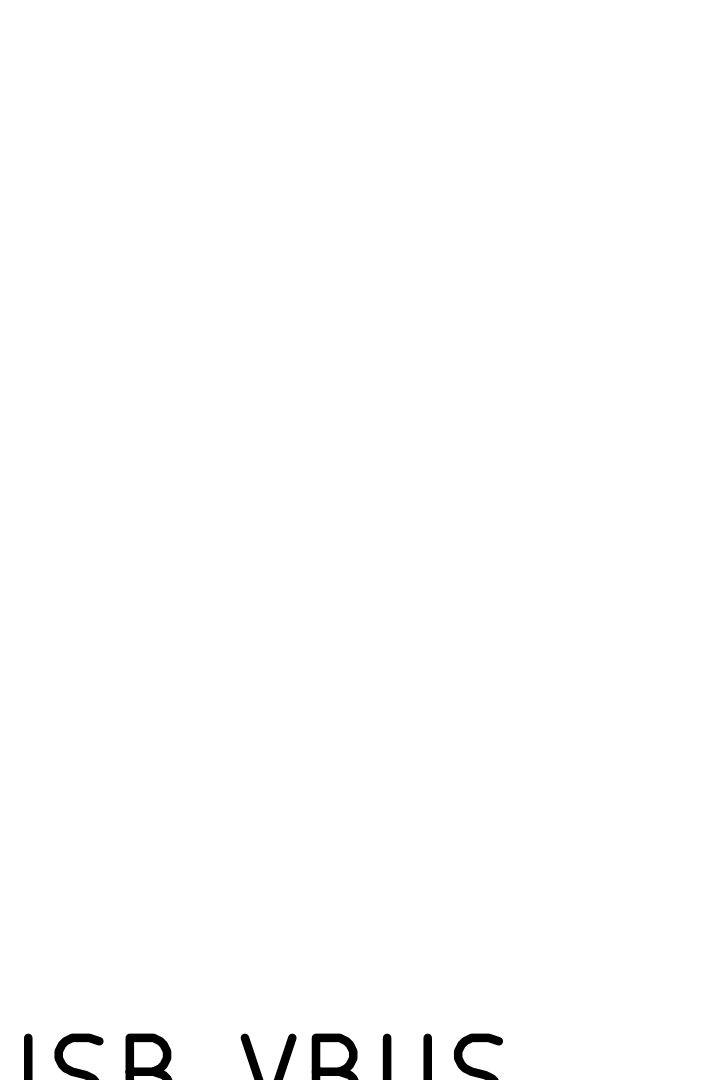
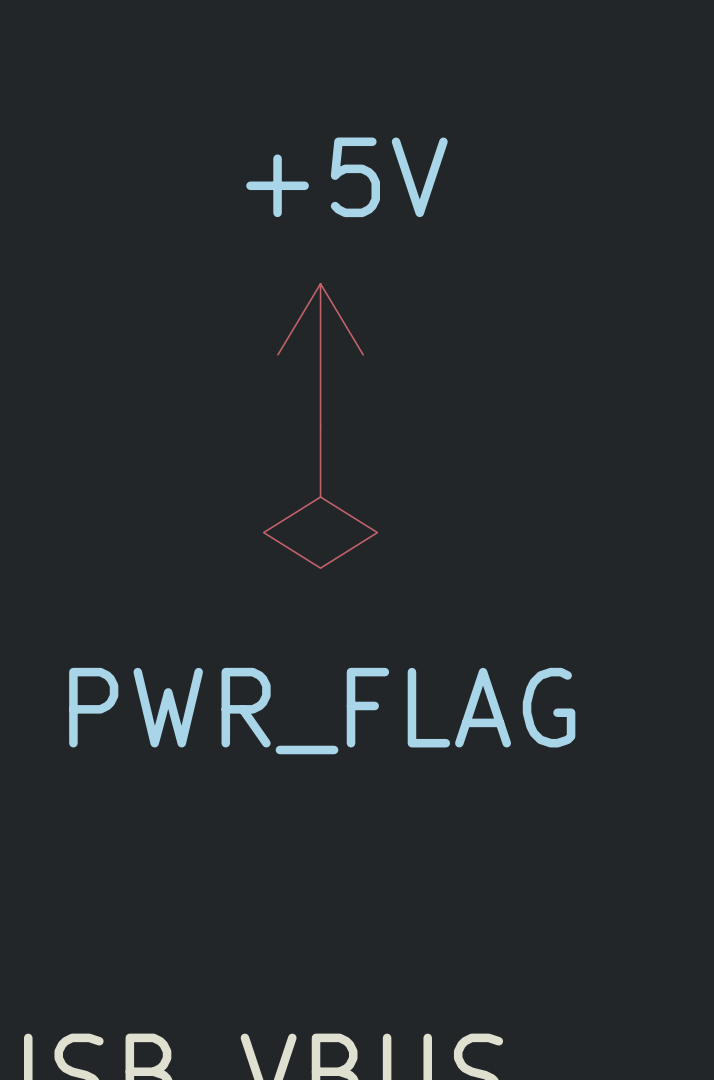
power symbol: none -> +5V (320, 354)
power symbol: none -> PWR_FLAG (320, 497)

